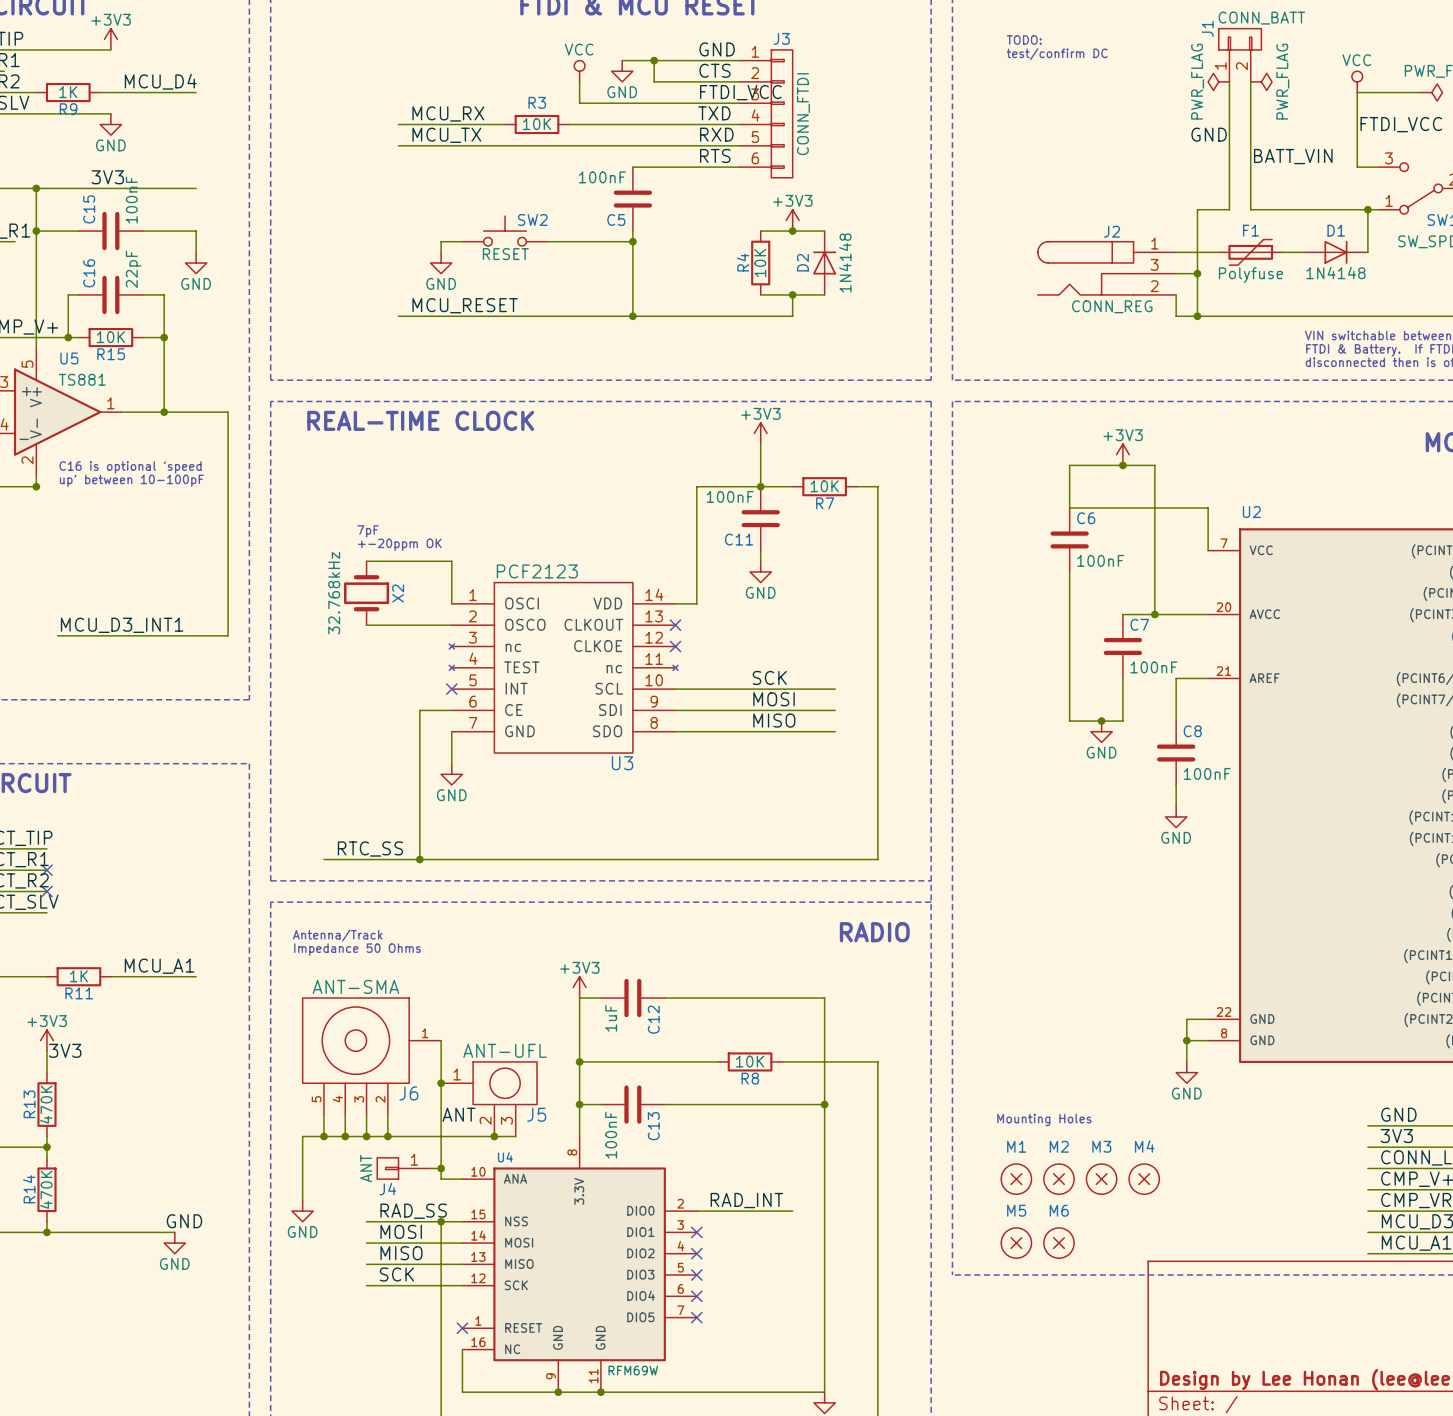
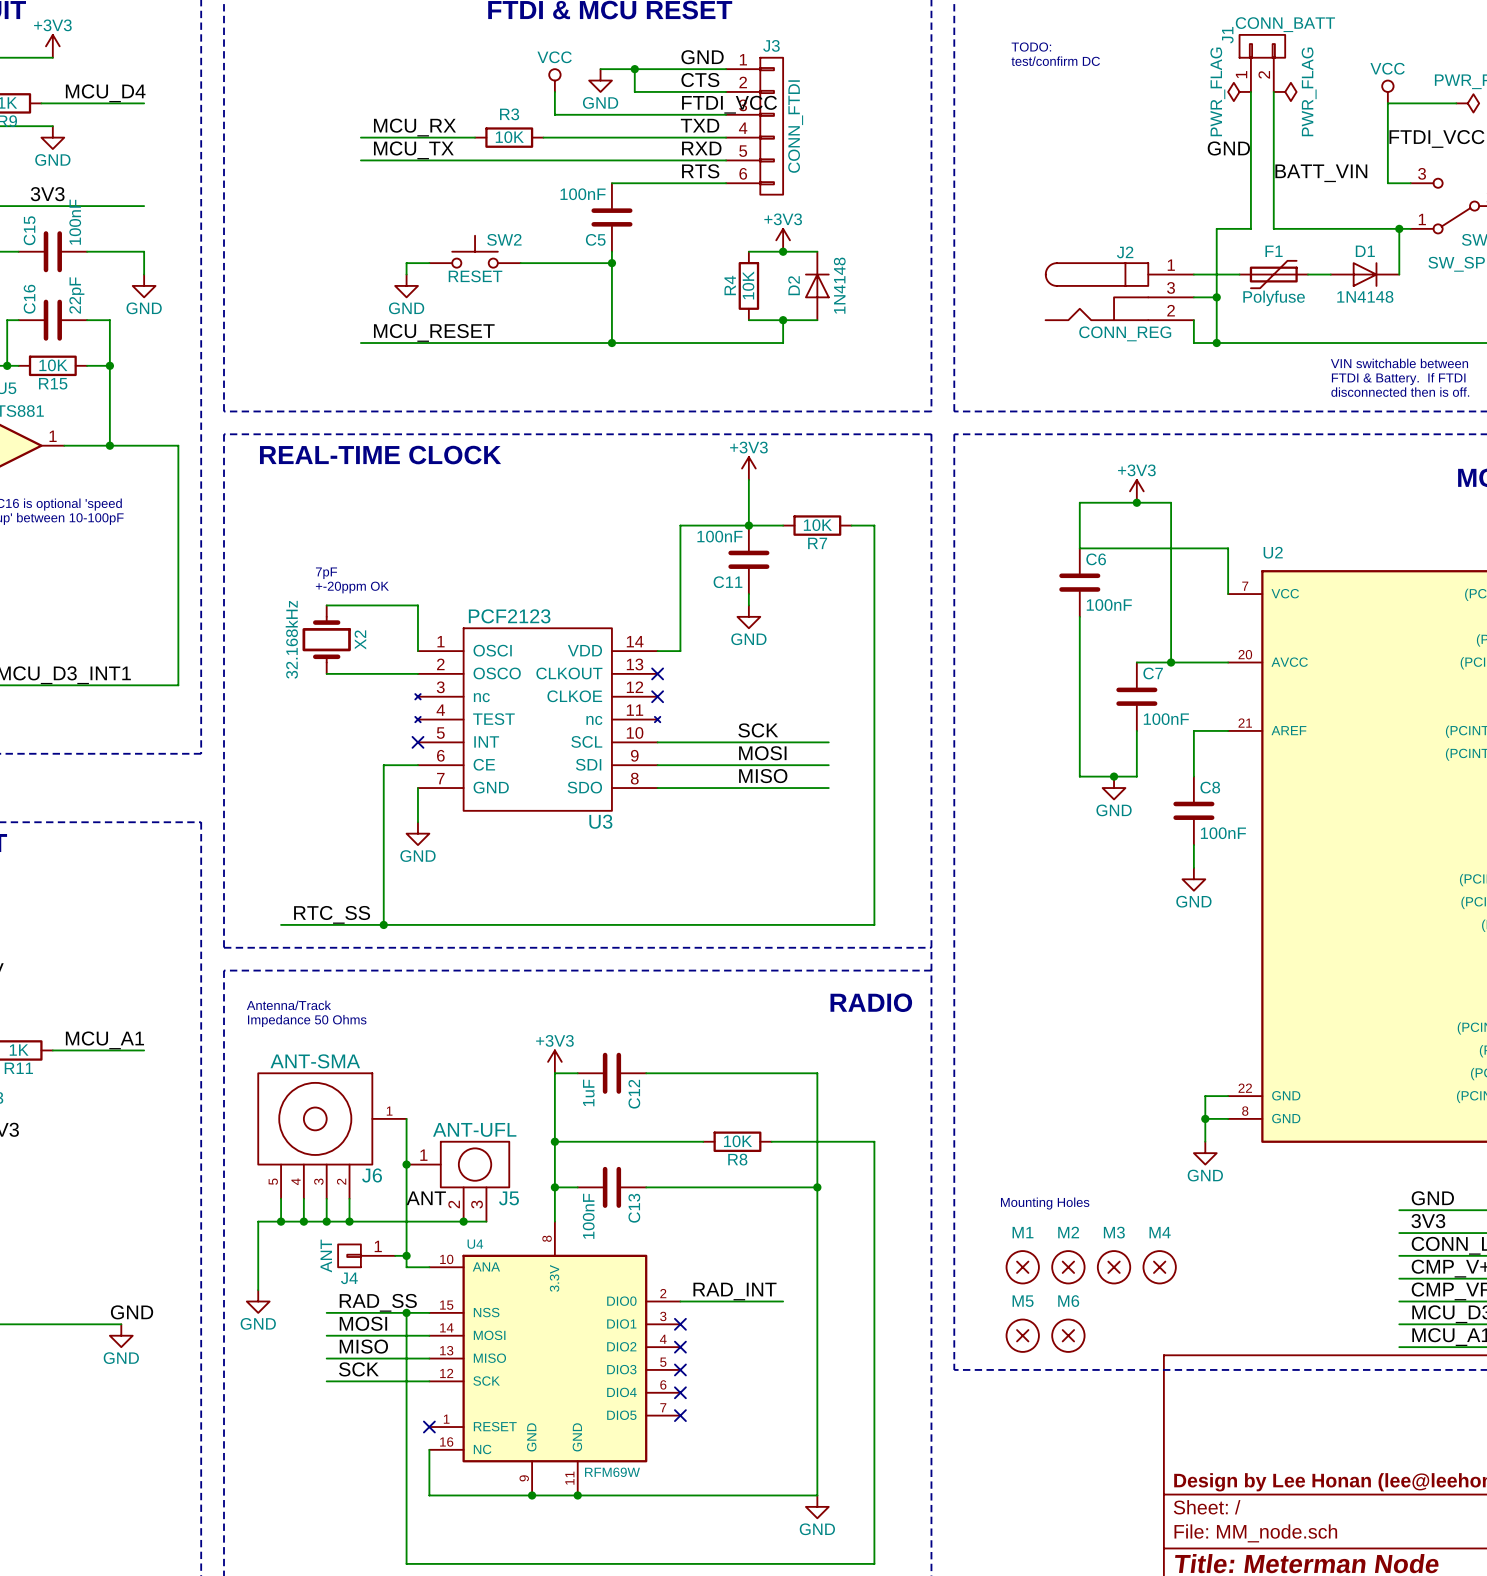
X2 value: 32.768kHz (334, 593) -> 32.168kHz (291, 639)

